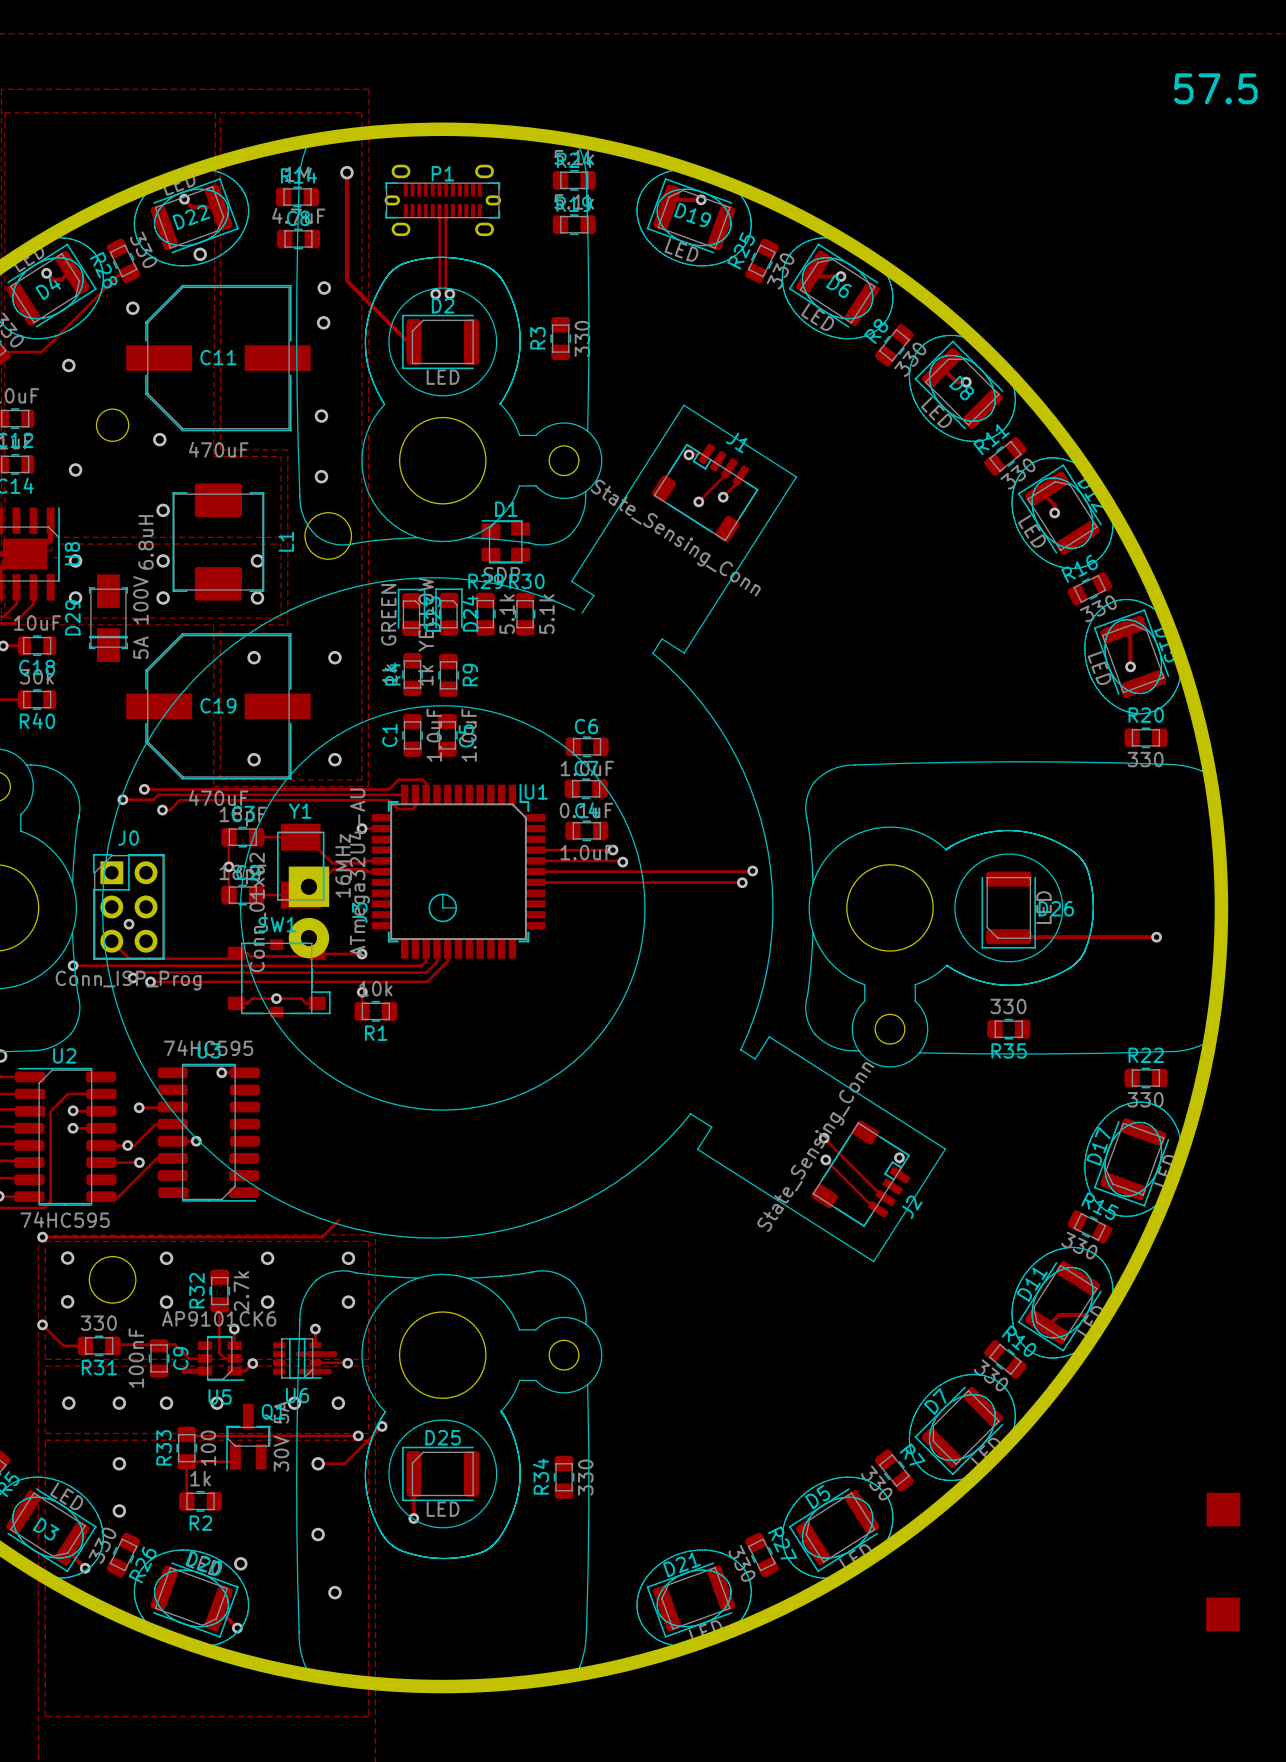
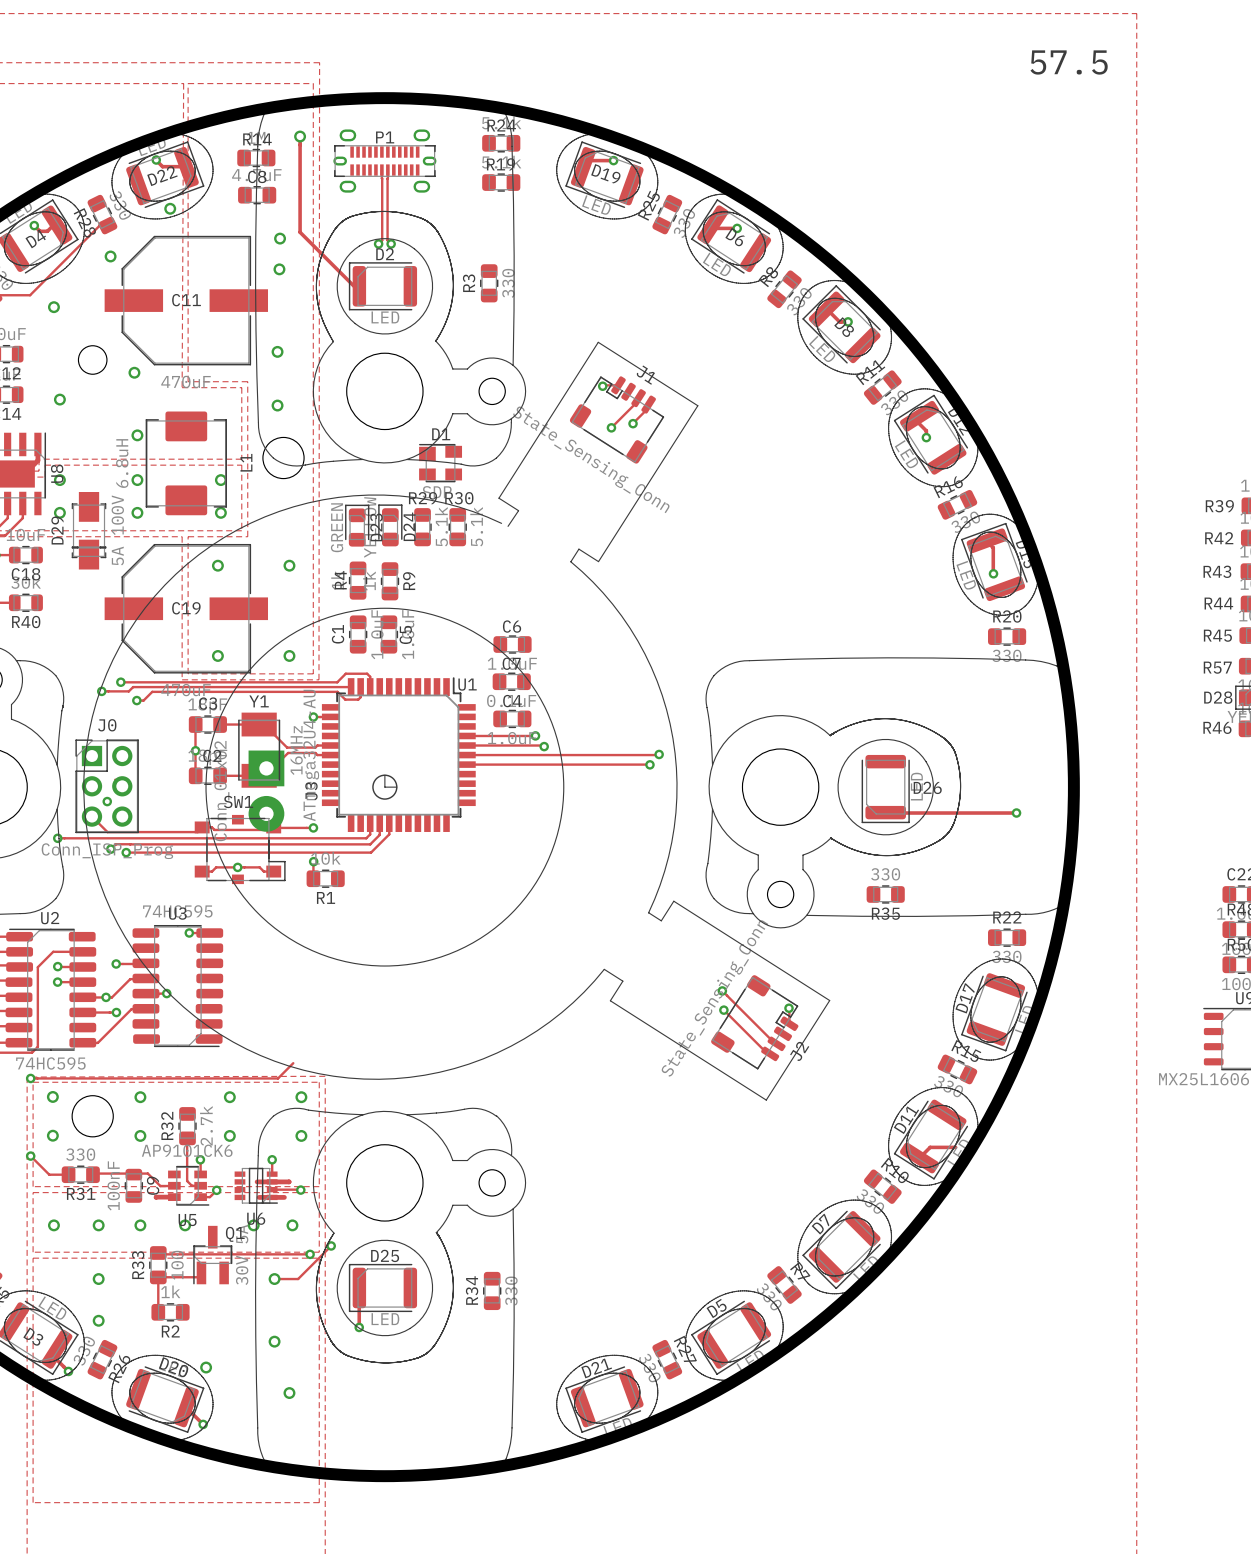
part: (1223, 1509) -> none
part: (1222, 1614) -> none

